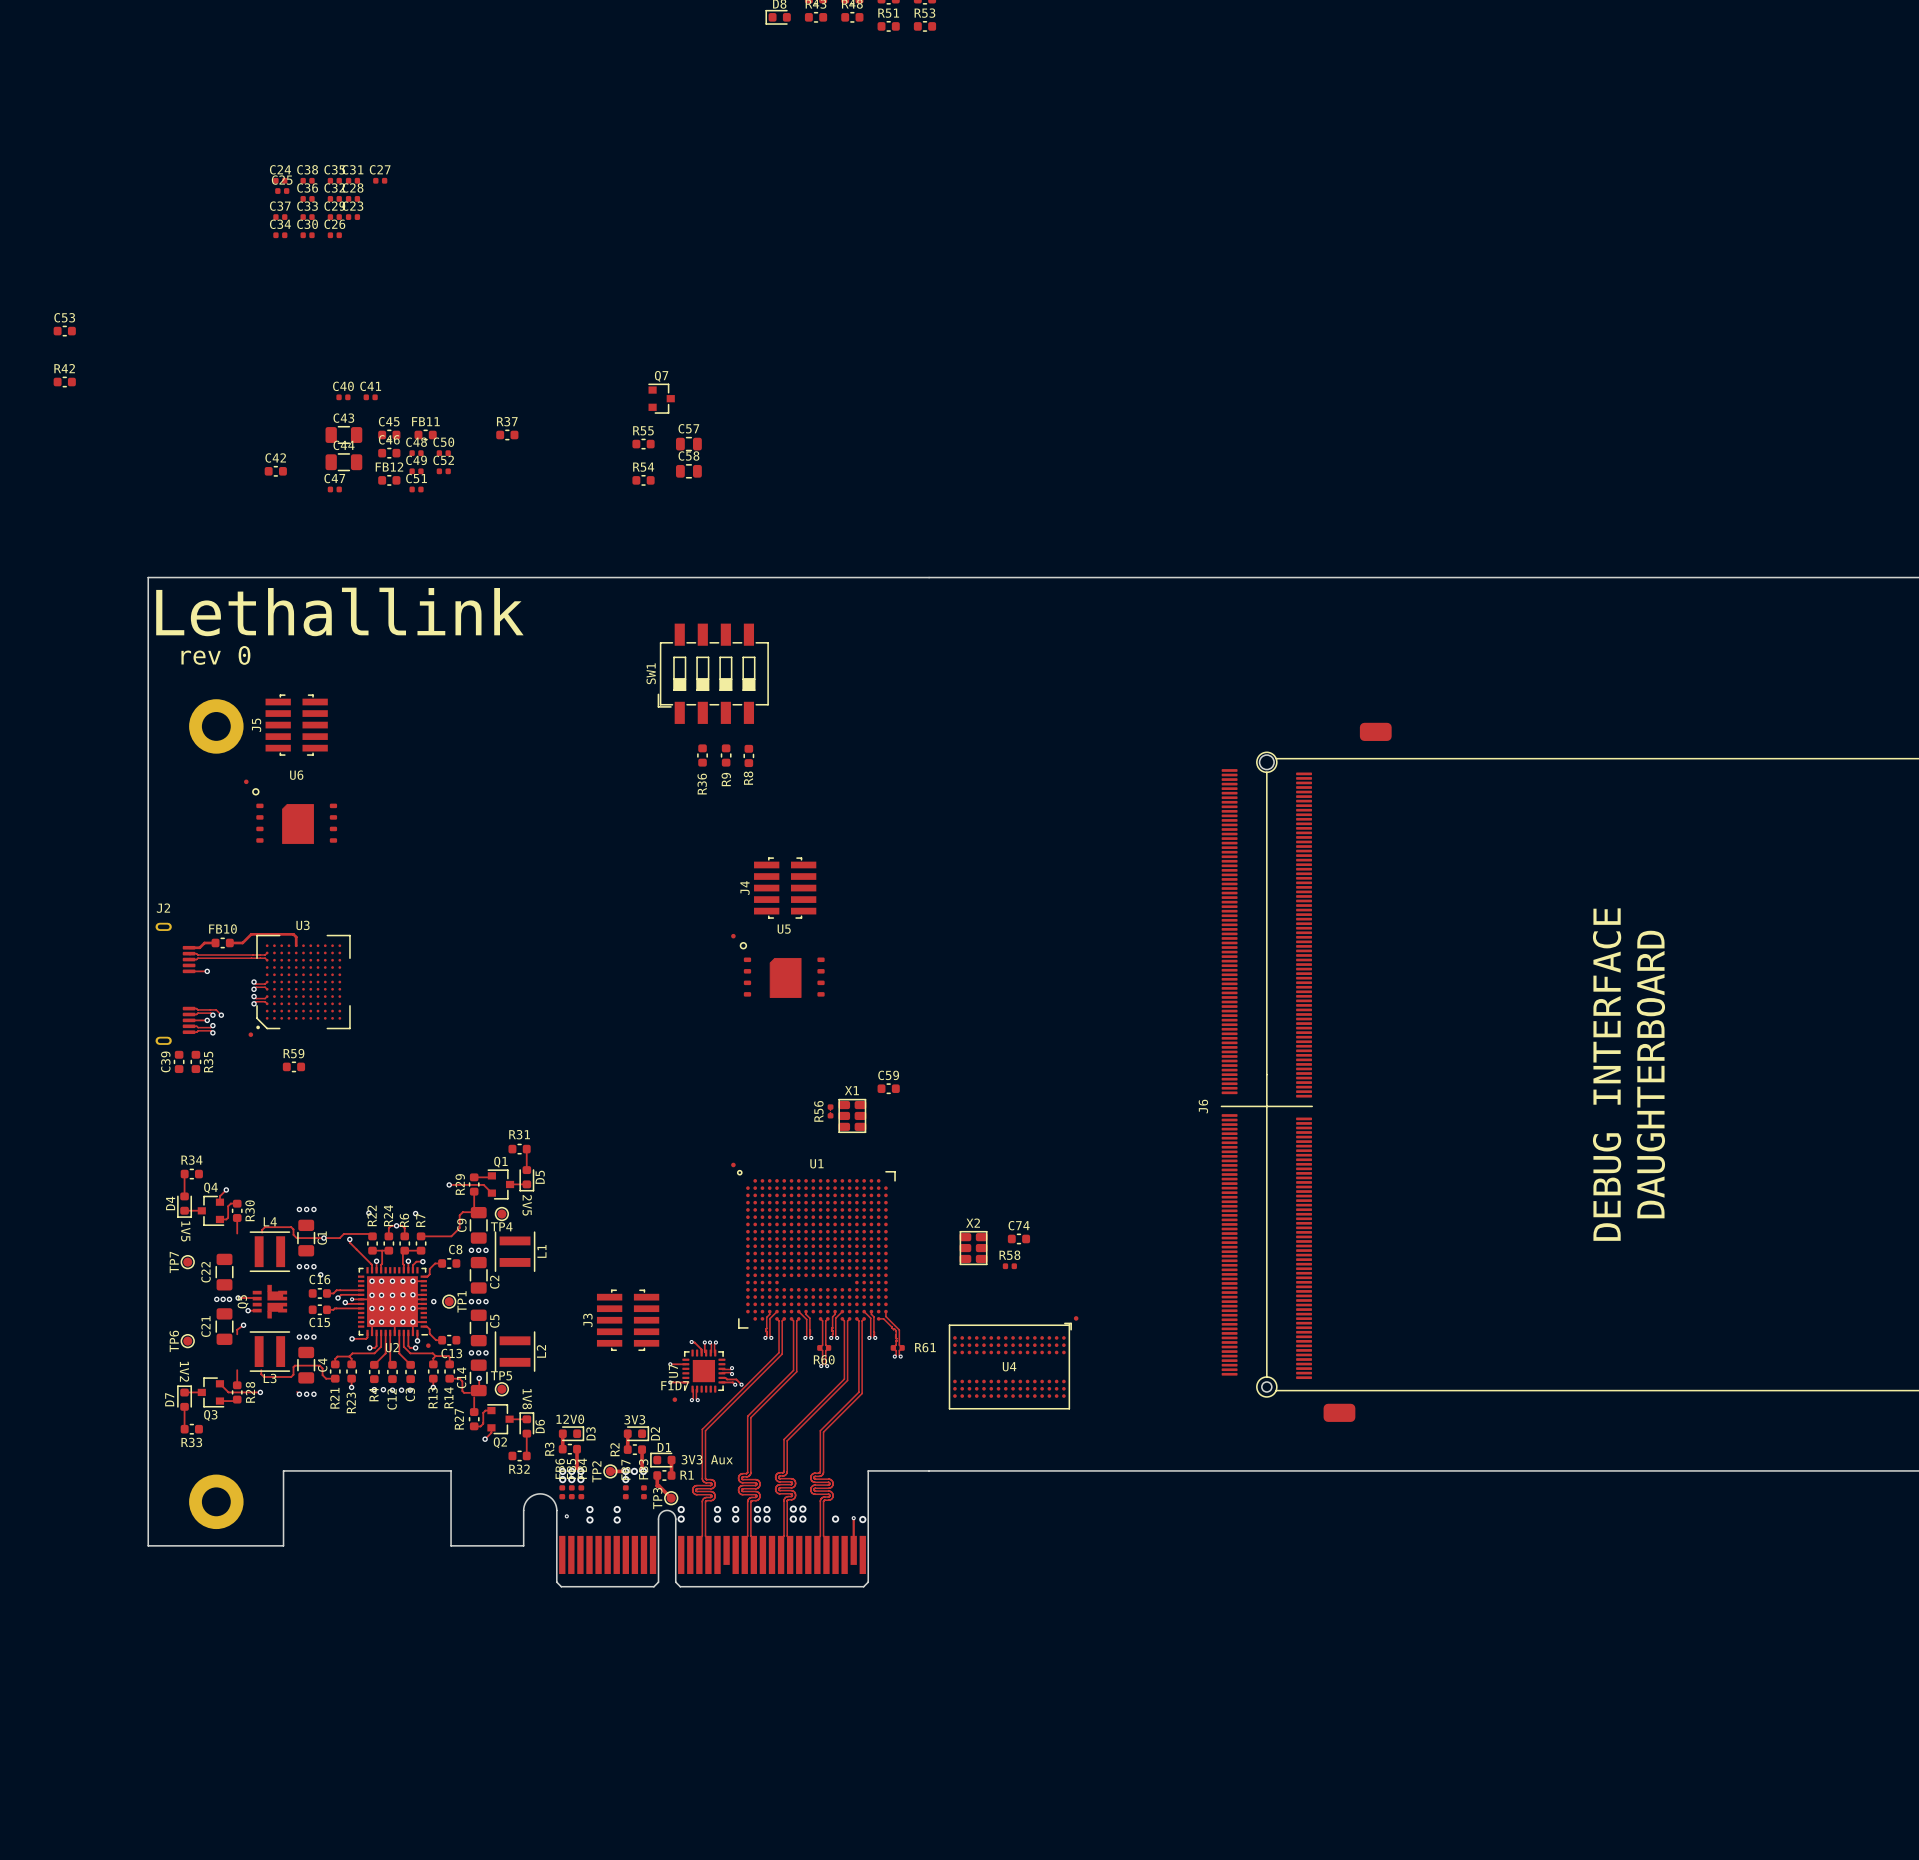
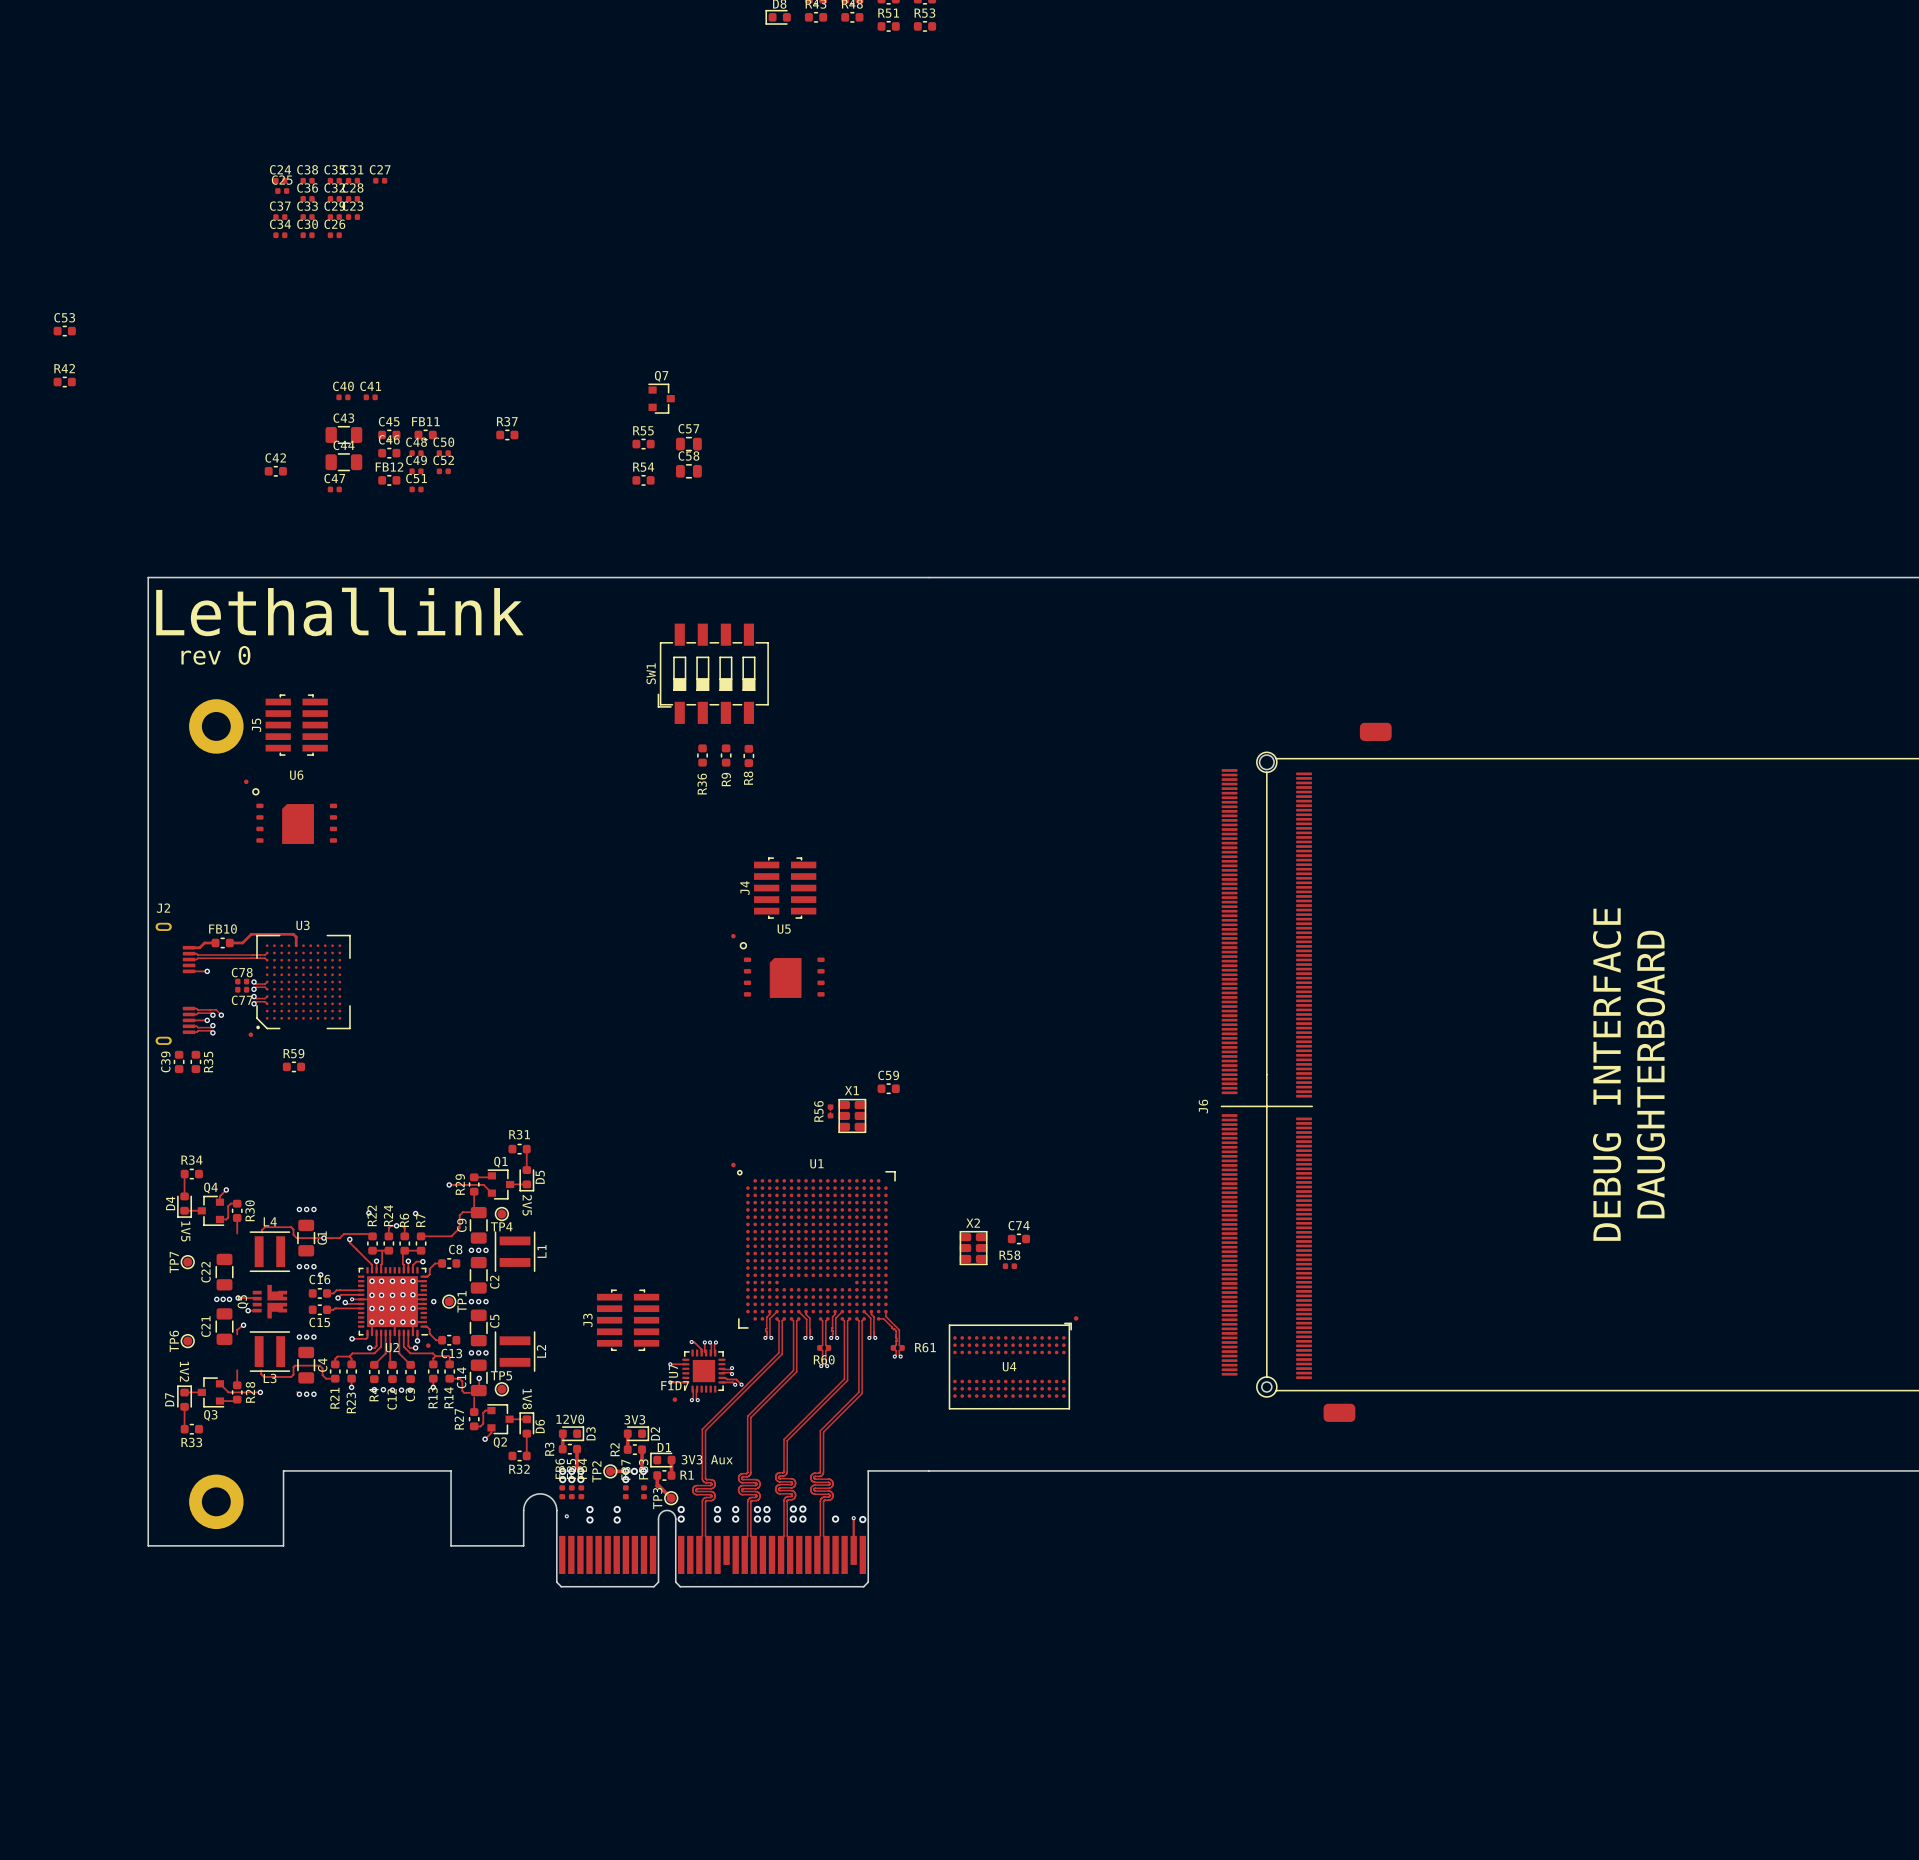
C78: none -> (242, 981)
C77: none -> (242, 989)

